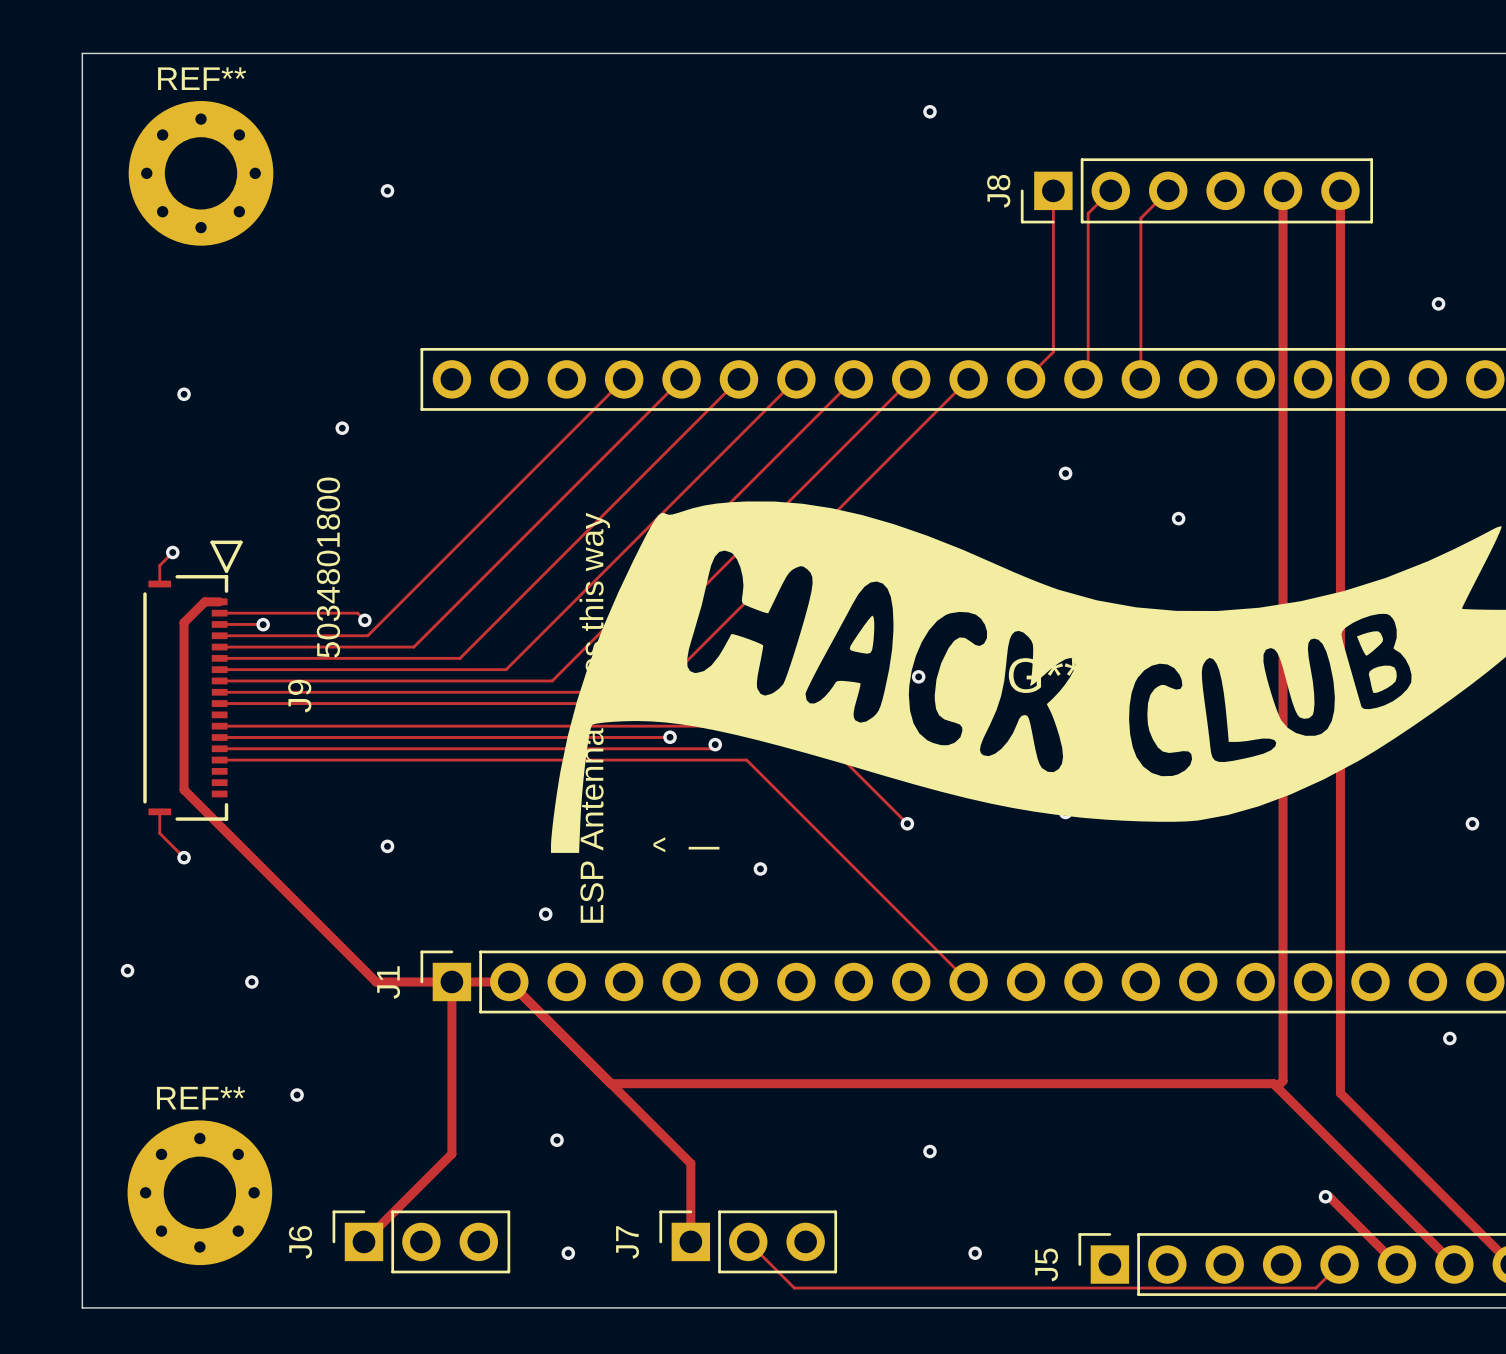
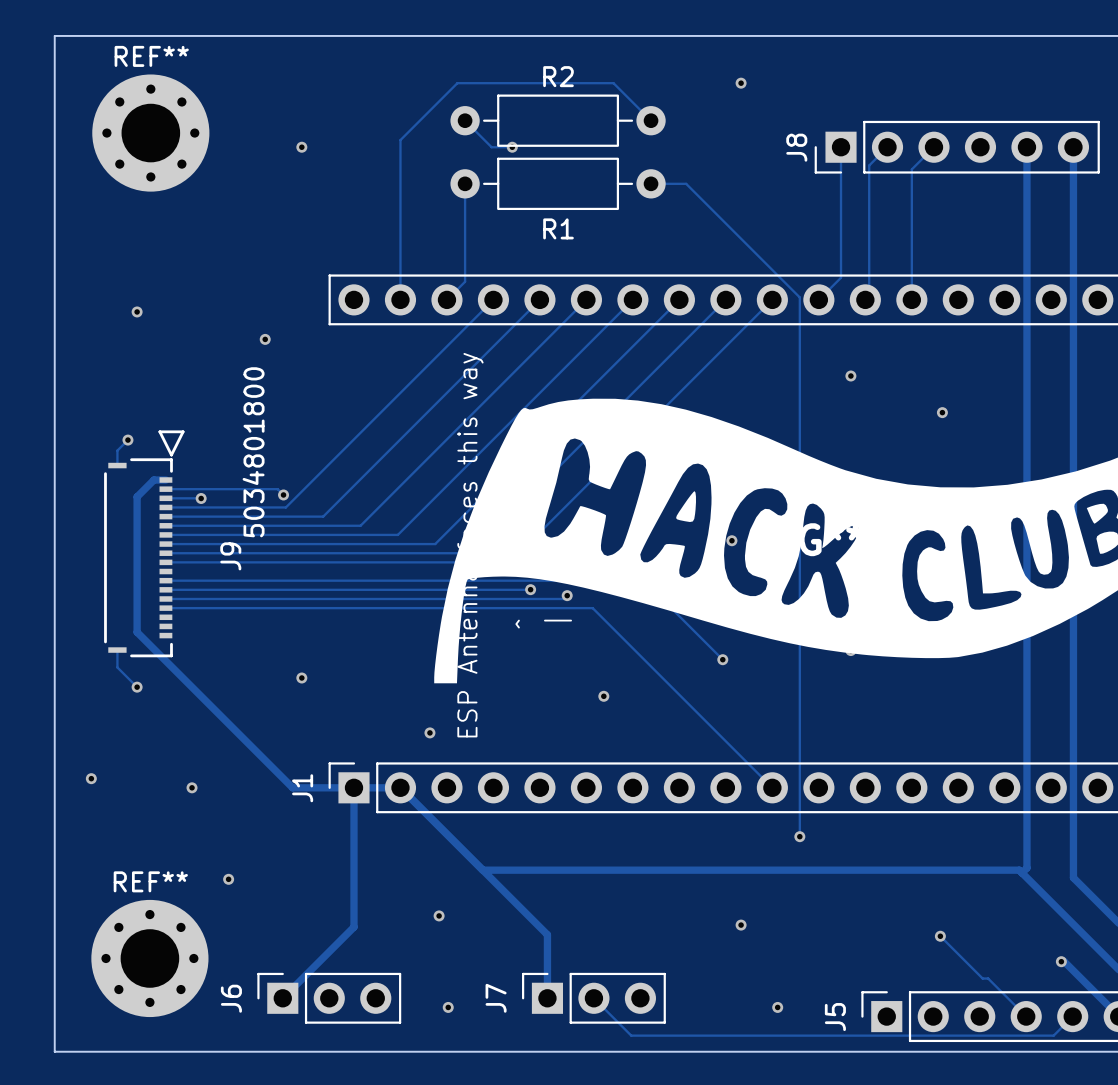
track: none -> (465, 120) (491, 147) (512, 147)
R2: none -> (558, 120)
track: none -> (651, 120) (613, 83) (457, 83) (400, 140) (400, 299)
via: none -> (512, 147)
track: none -> (465, 183) (465, 281) (446, 299)
R1: none -> (558, 183)
track: none -> (651, 183) (686, 183) (799, 297) (799, 836)
via: none -> (799, 836)
track: none -> (940, 936) (982, 978) (988, 978) (1026, 1016)
via: none -> (940, 936)

